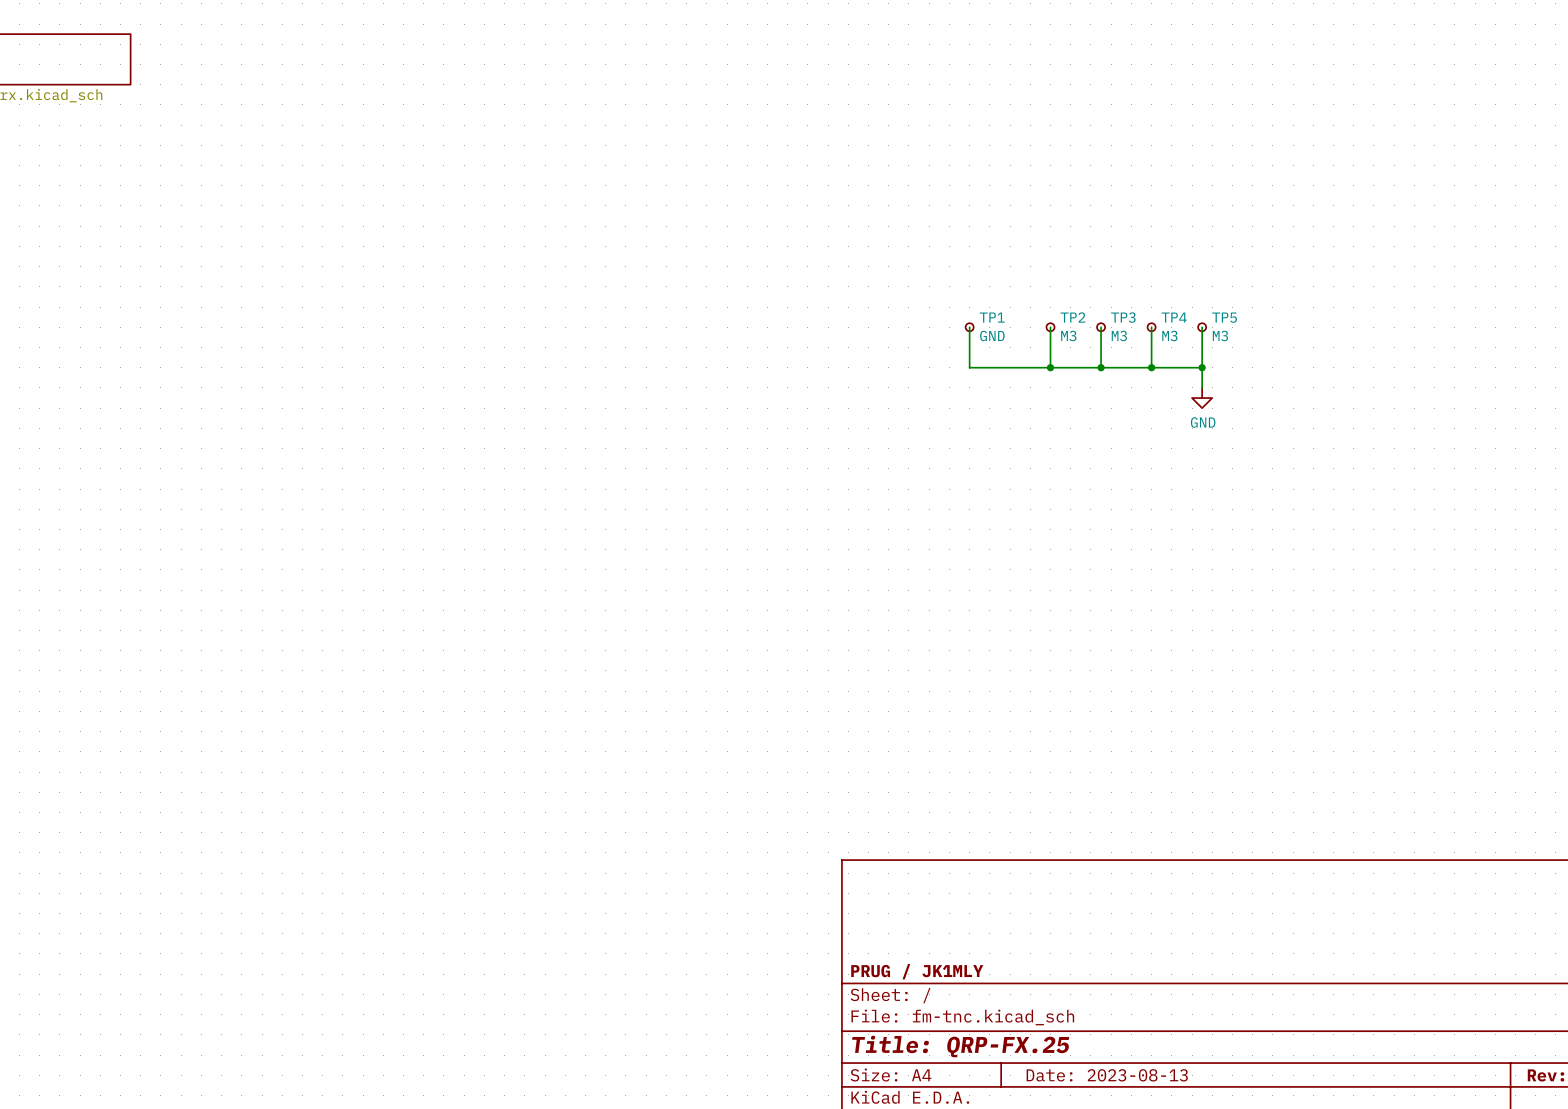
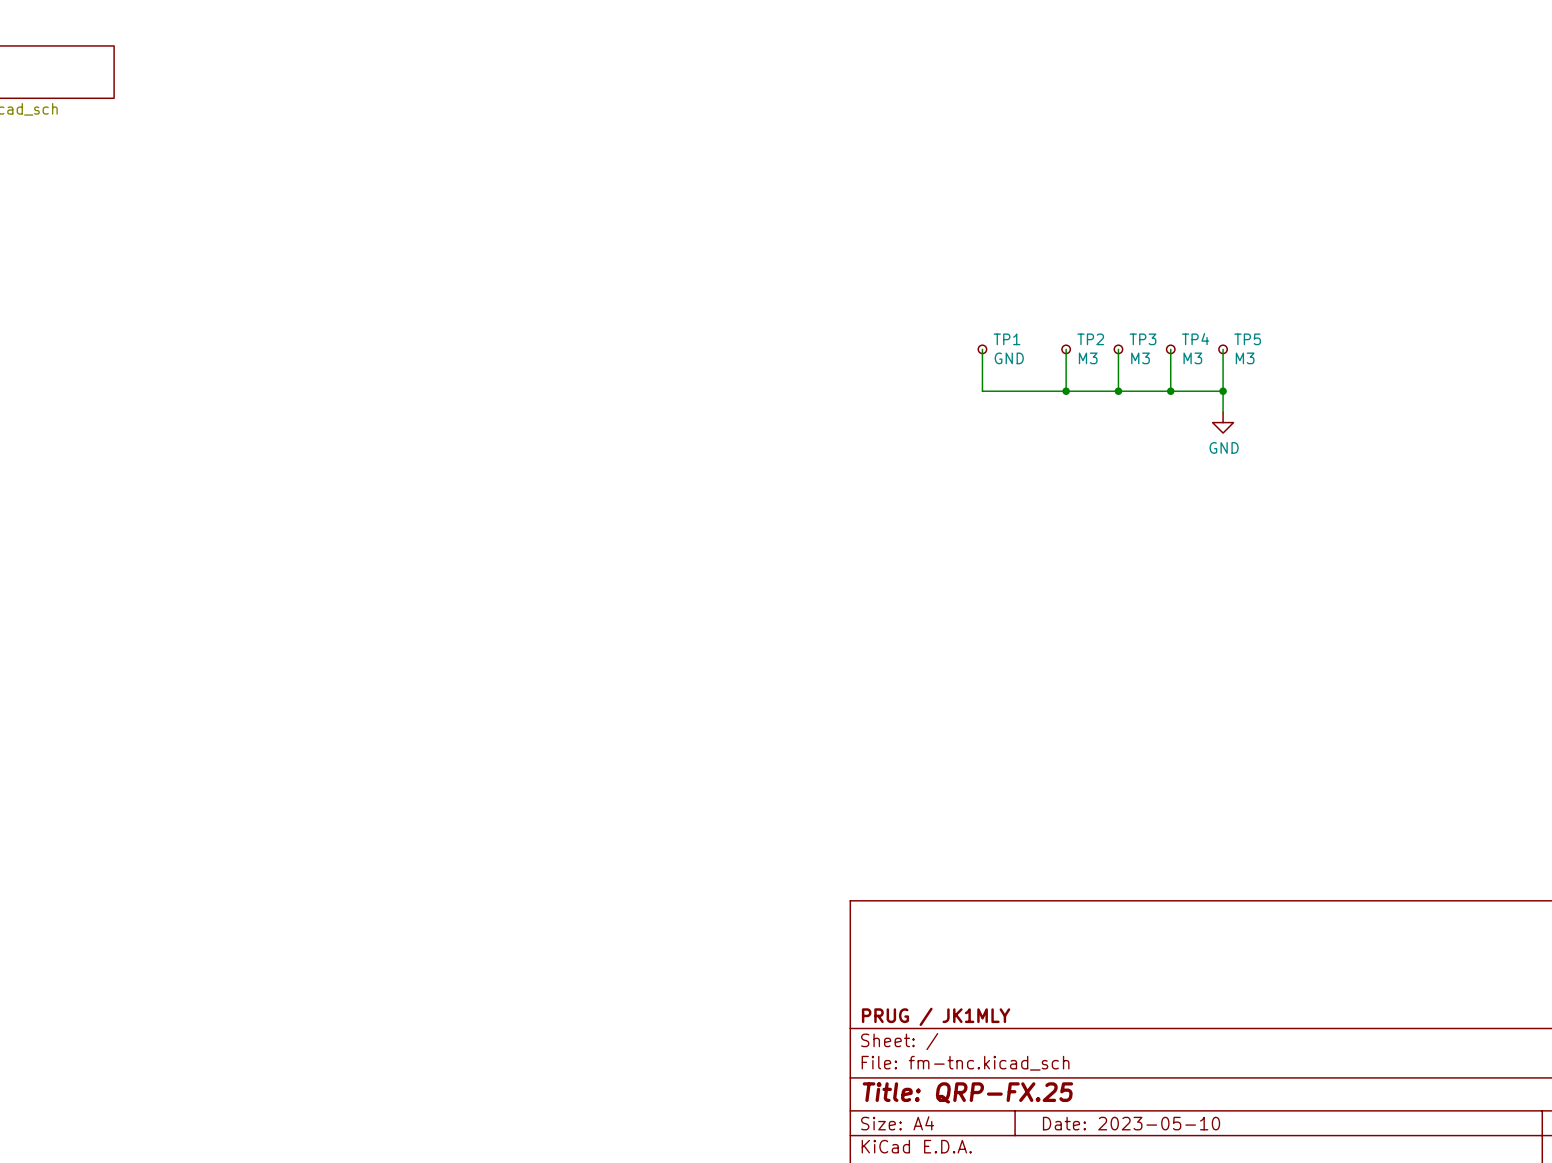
title block: Date: 2023-08-13 (1107, 1075) -> Date: 2023-05-10 (1131, 1123)

